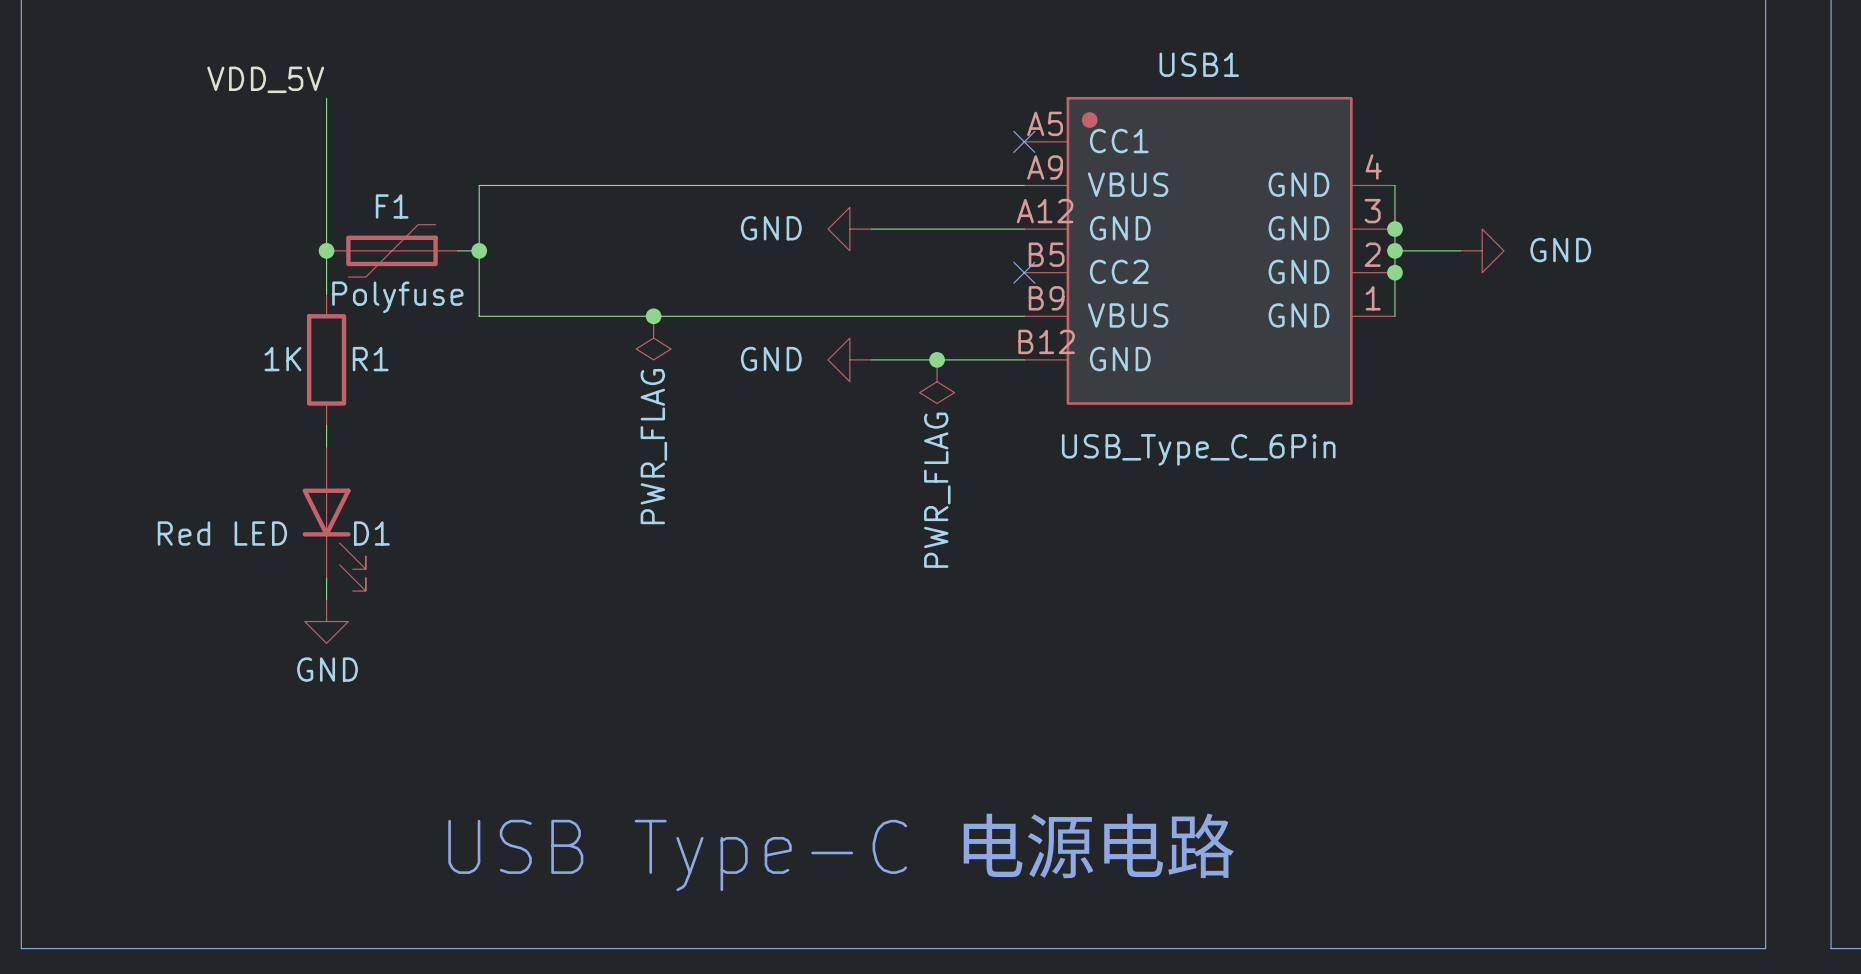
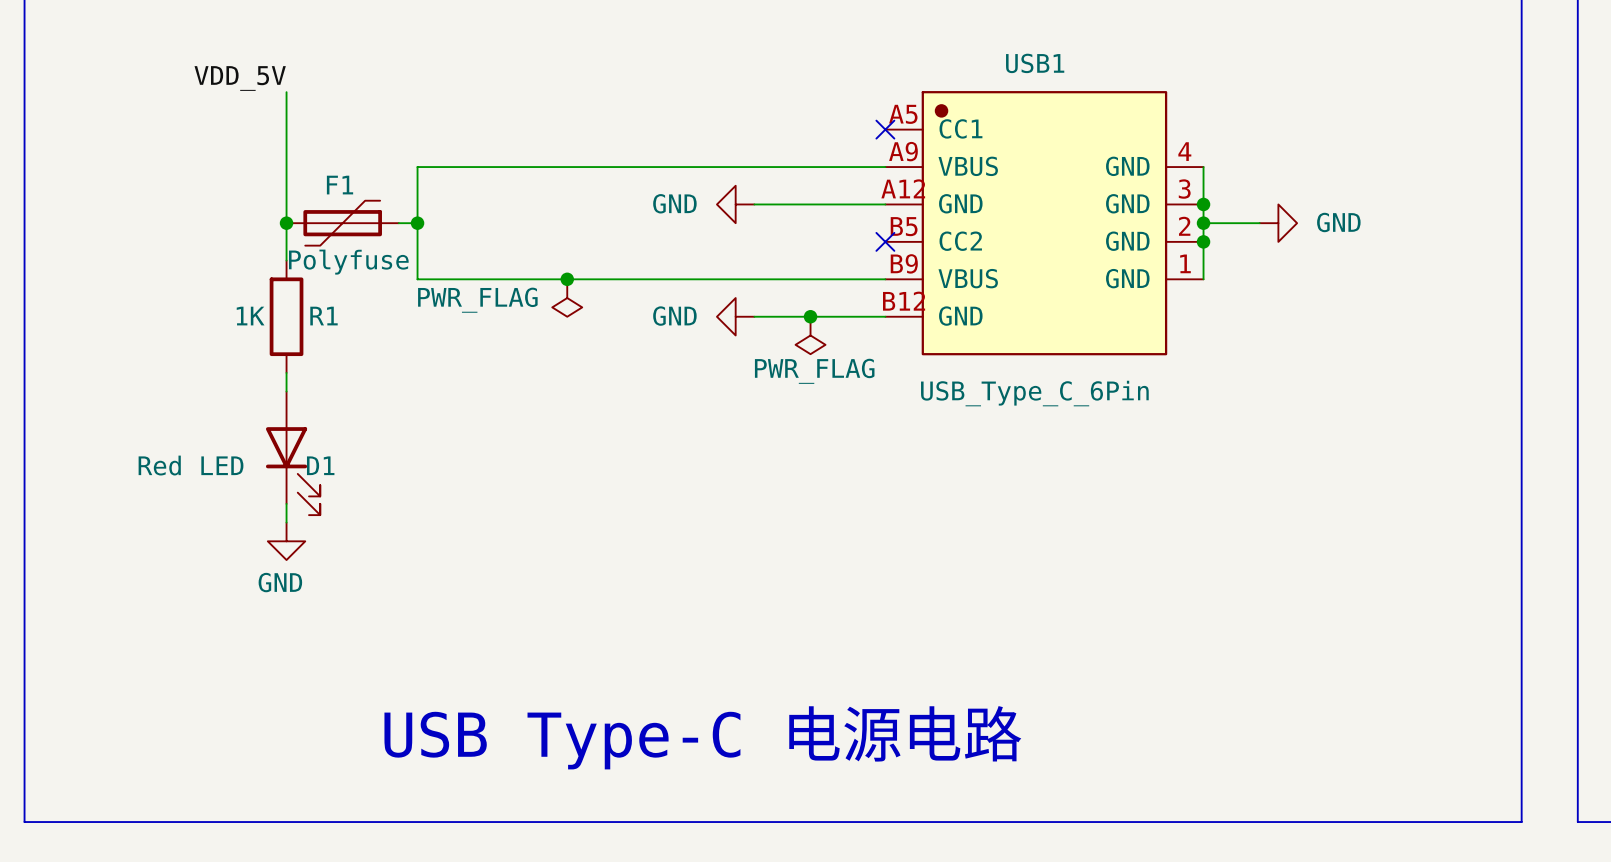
power symbol text rotation: 0° (653, 446) -> 90° clockwise (477, 300)
power symbol text rotation: 0° (937, 490) -> 90° clockwise (814, 371)

